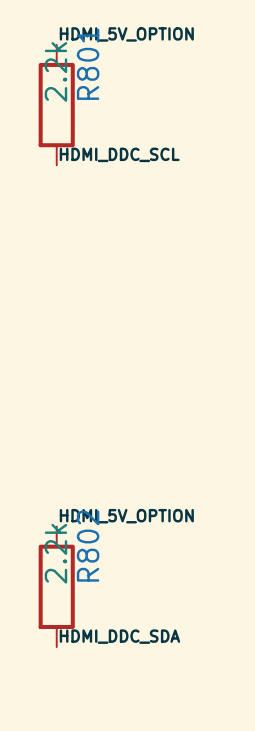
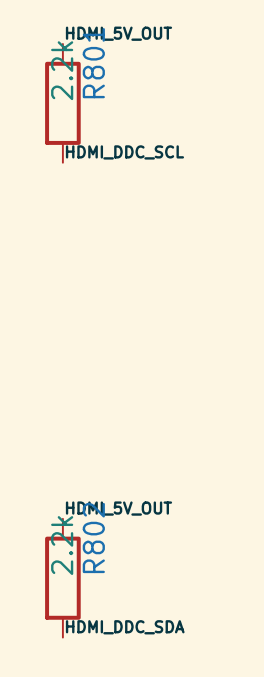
label: HDMI_5V_OPTION (126, 34) -> HDMI_5V_OUT (118, 33)
label: HDMI_5V_OPTION (126, 516) -> HDMI_5V_OUT (118, 508)

